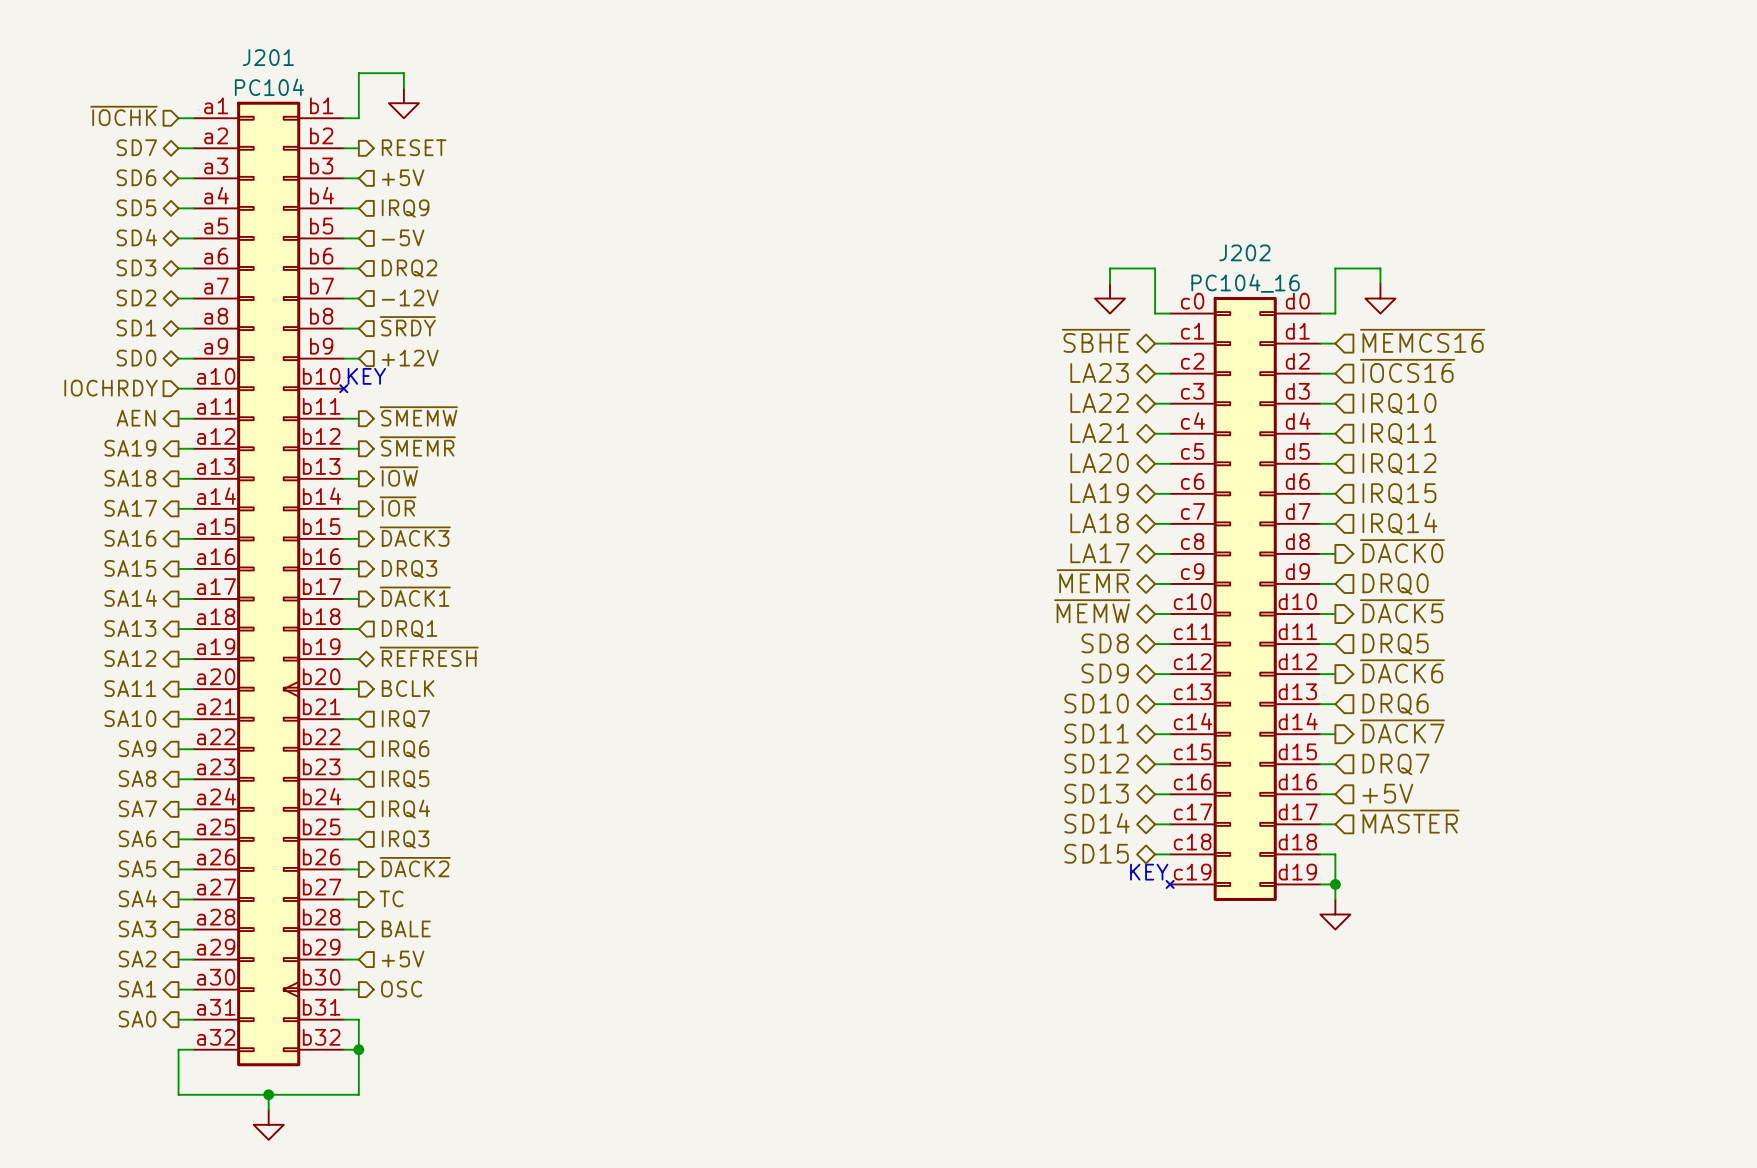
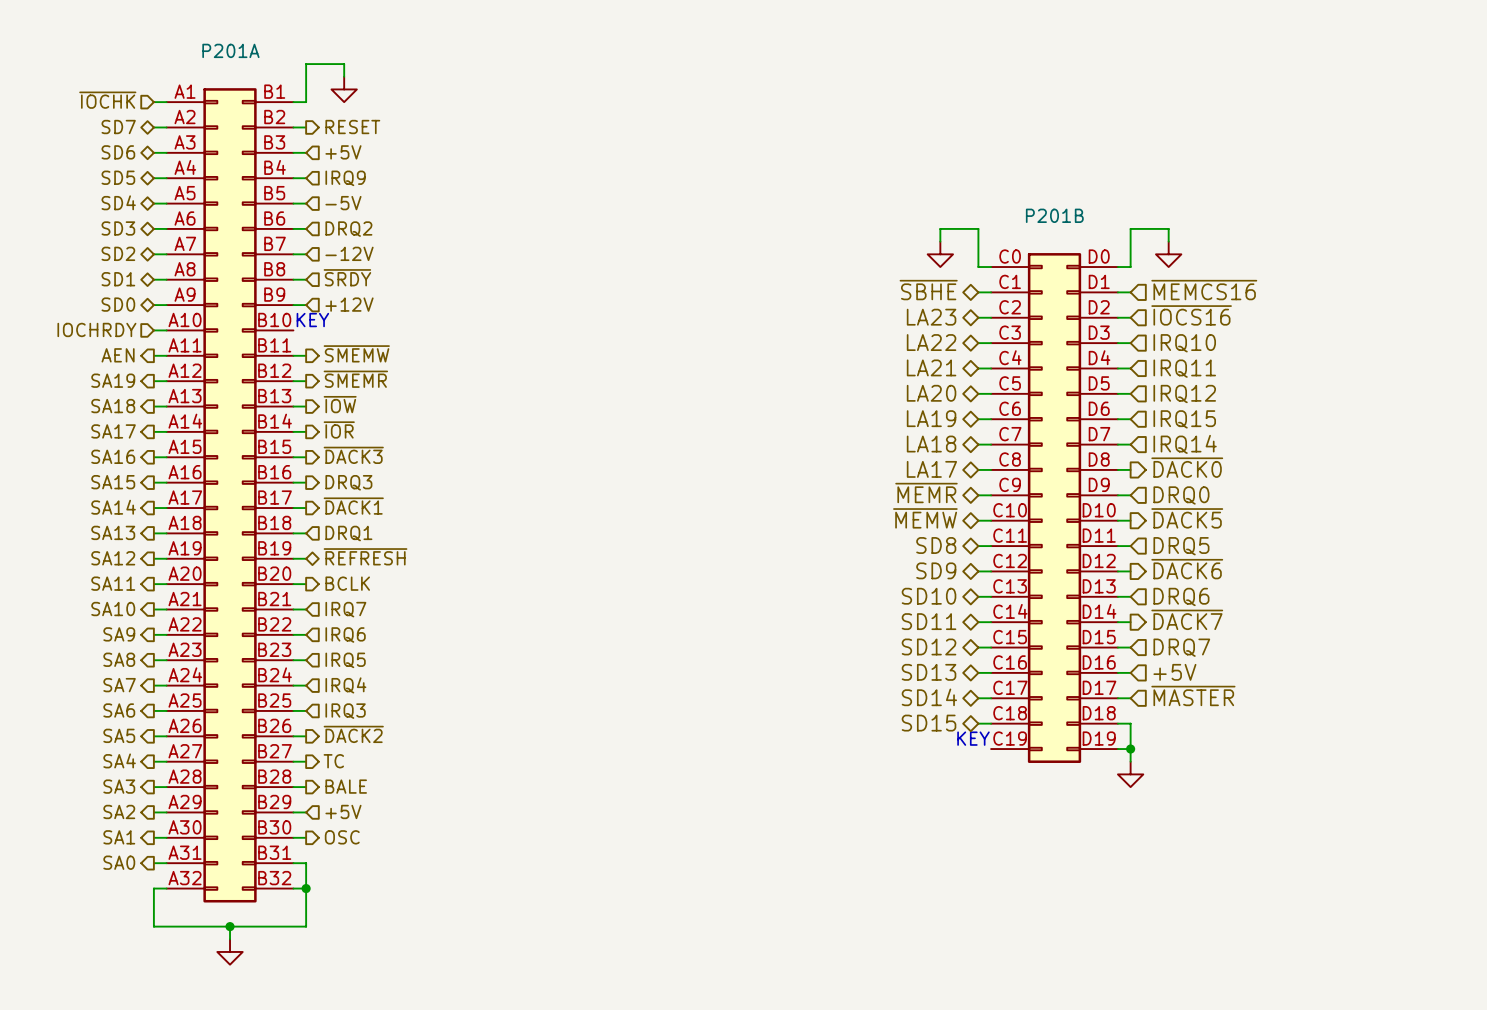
P201A: none -> (230, 495)
J201: PC104 (270, 583) -> none
J202: PC104_16 (1243, 599) -> none
P201B: none -> (1054, 508)

